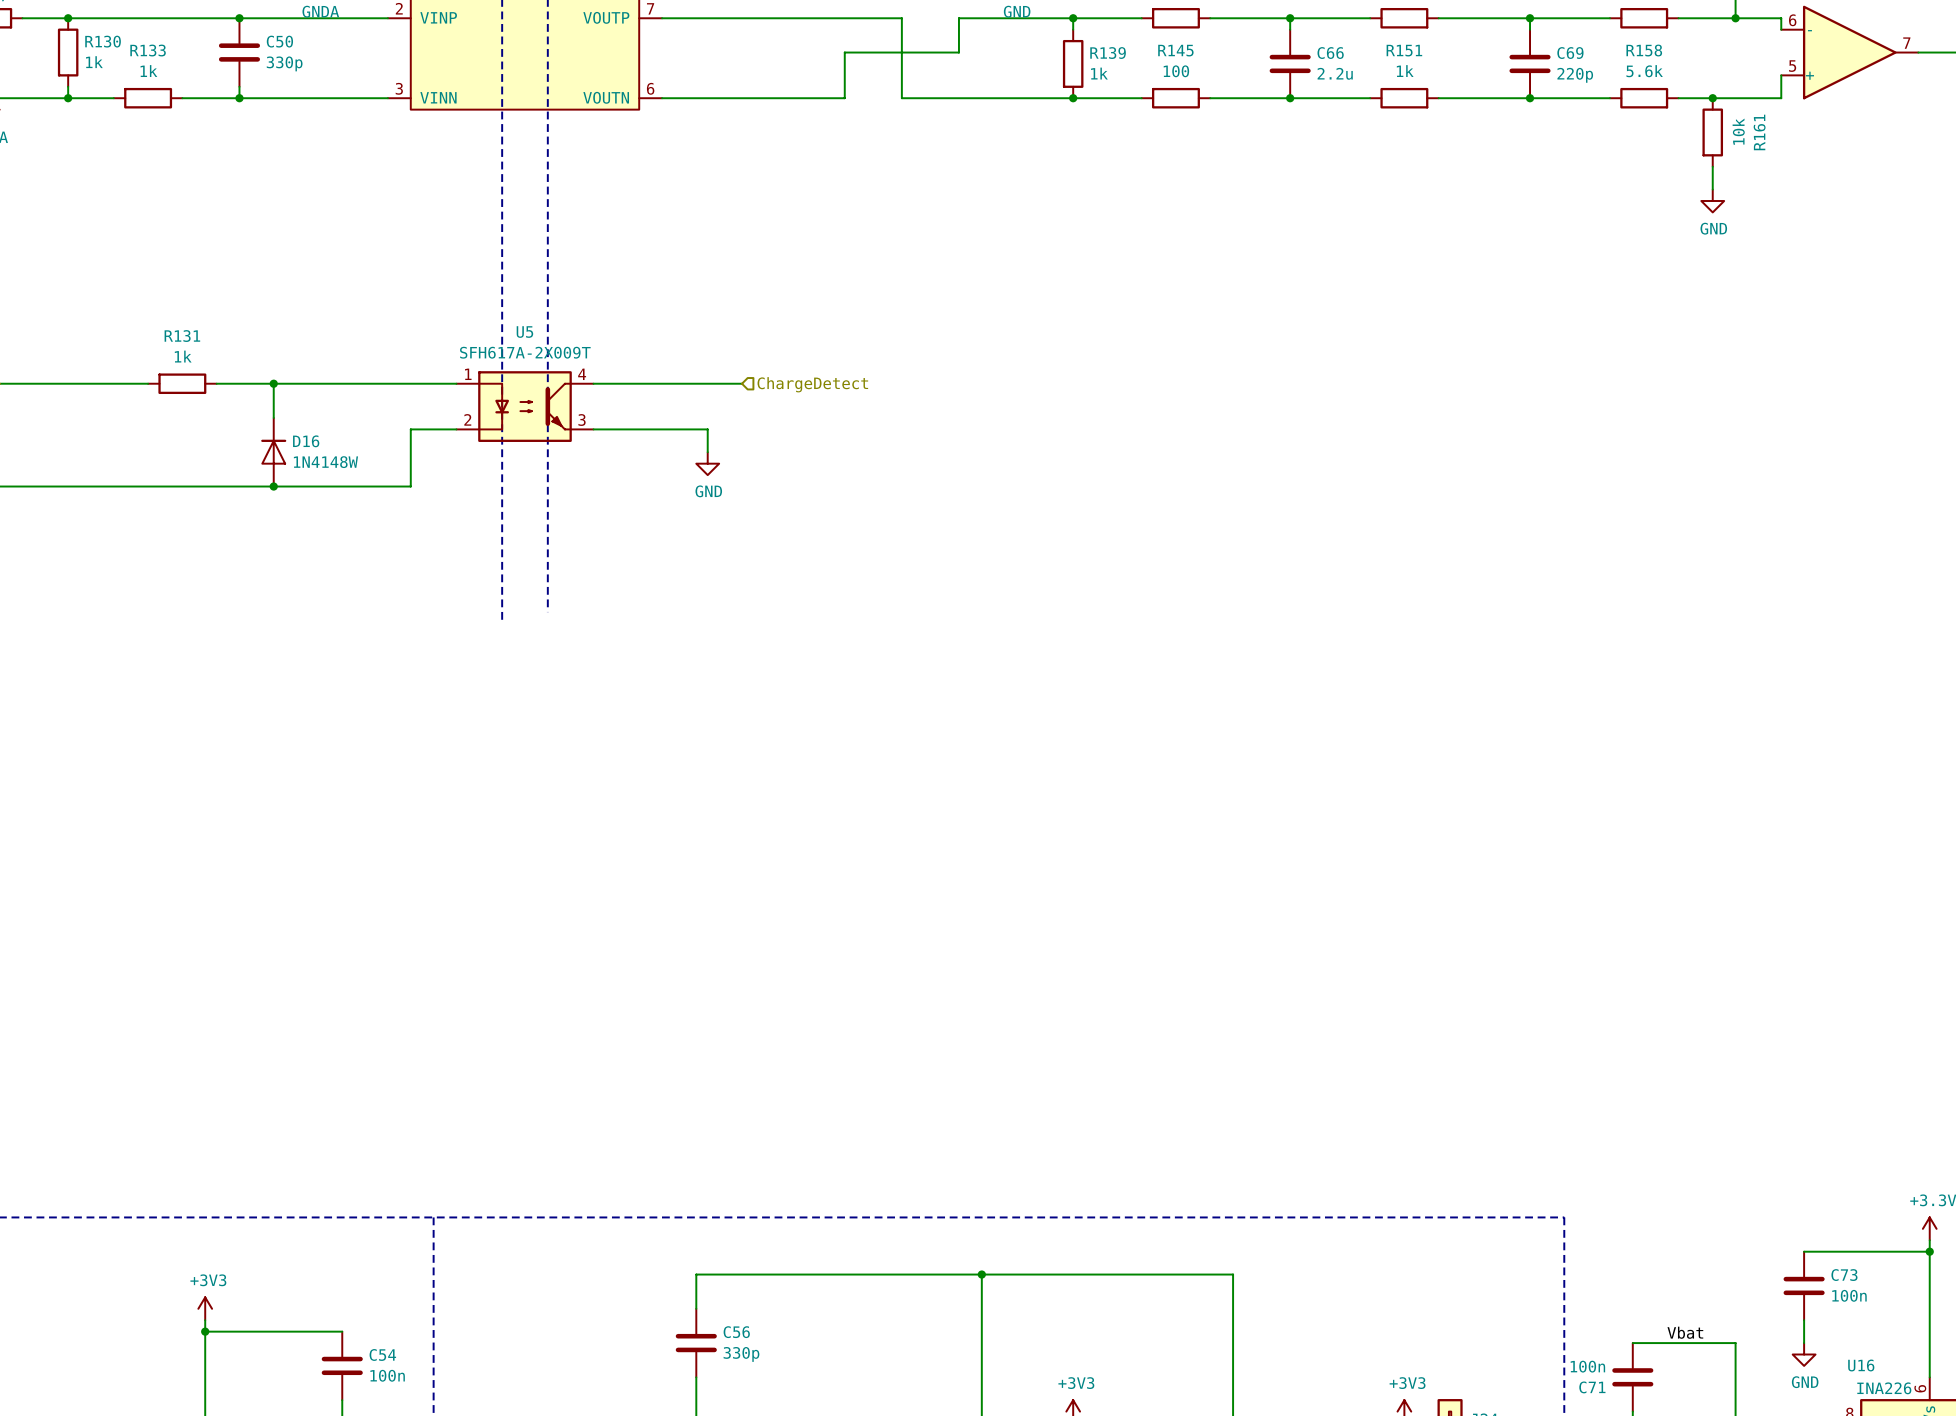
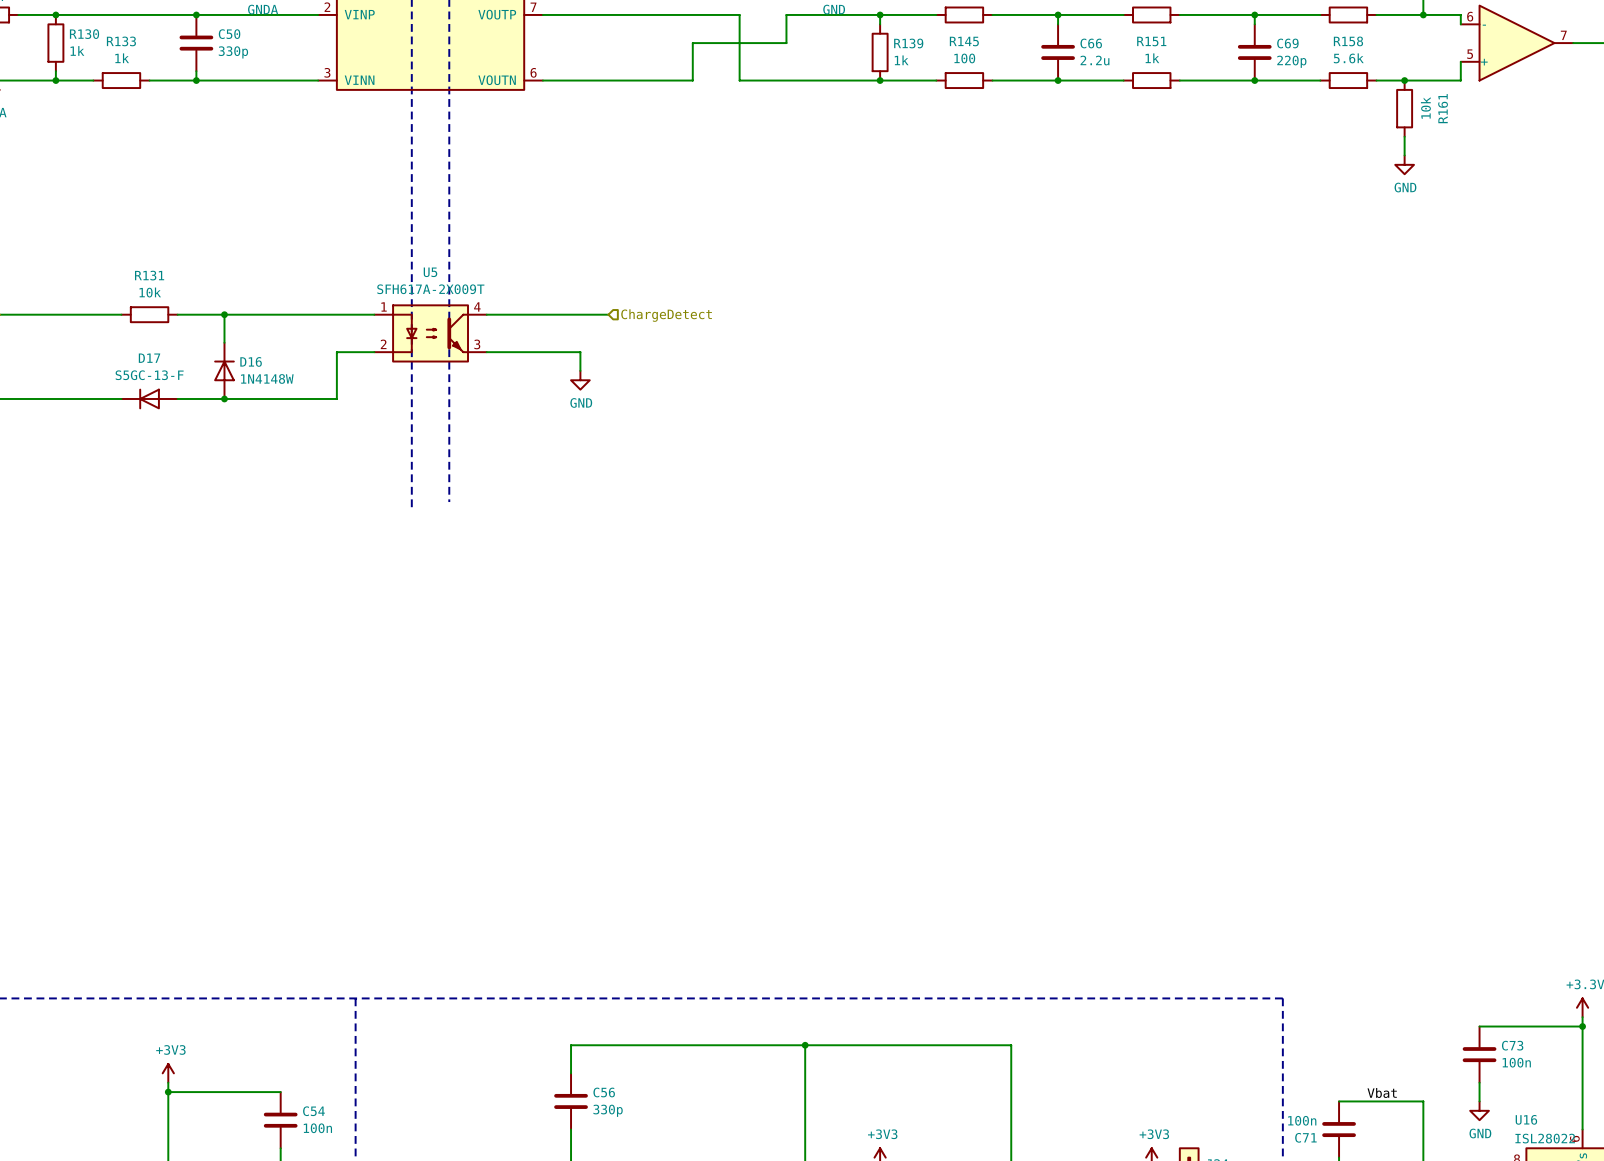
R131 value: 1k (183, 356) -> 10k (150, 292)
D17: none -> S5GC-13-F (149, 398)
U16 value: INA226 (1884, 1388) -> ISL28022 (1545, 1138)

